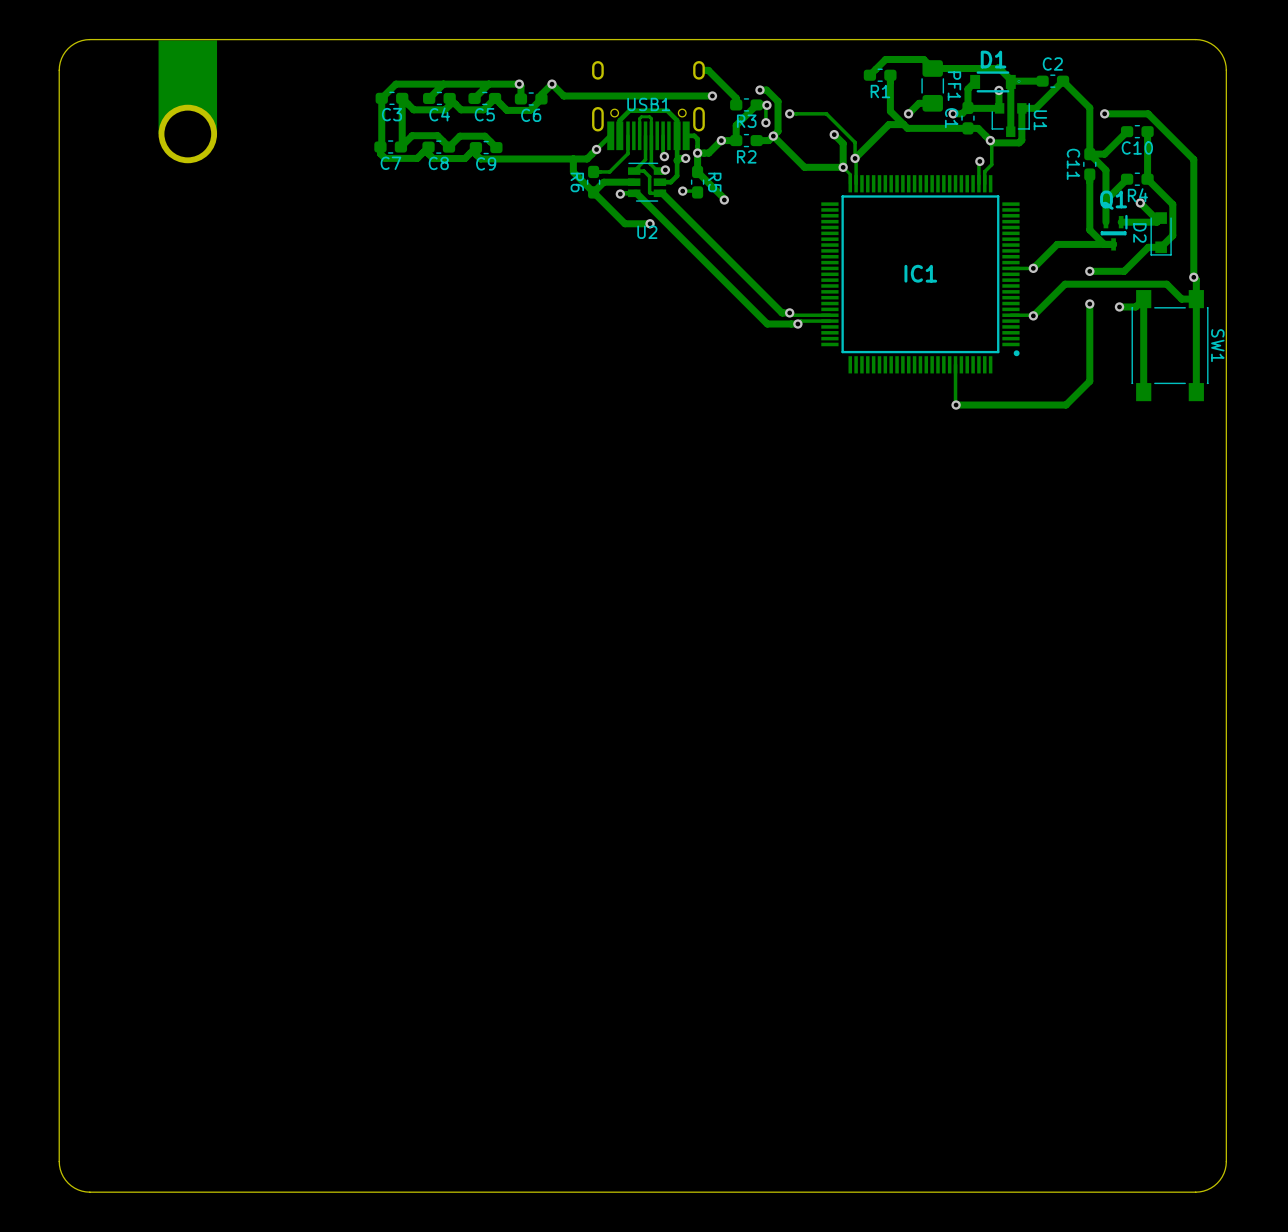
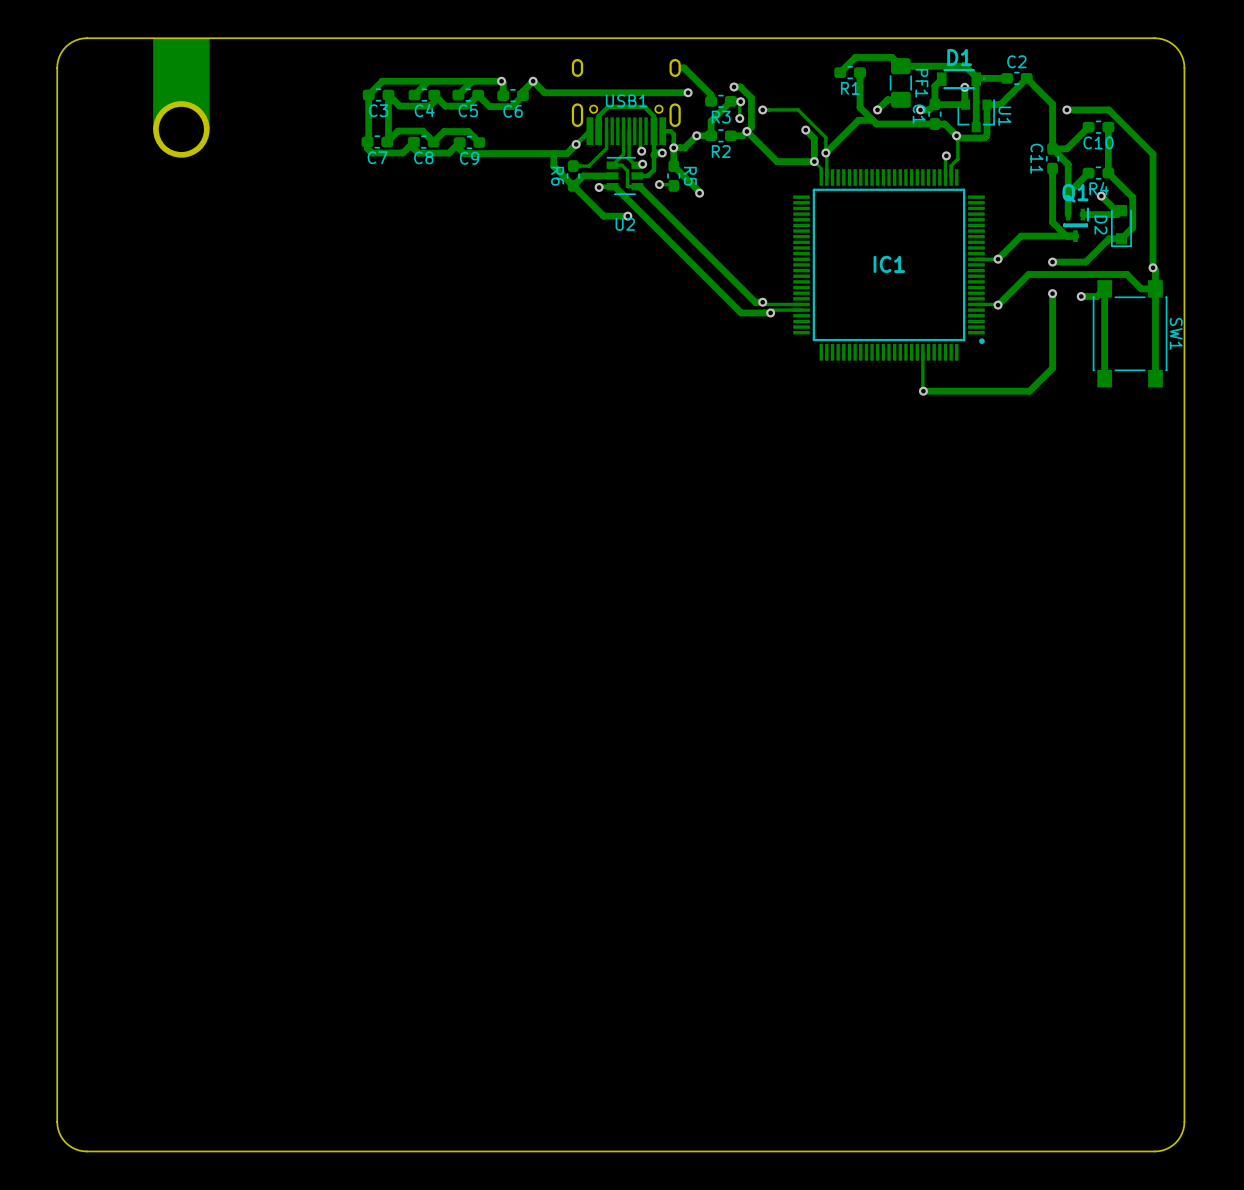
track: (651, 135) (651, 118) (649, 116) (639, 118) (639, 135) -> none

